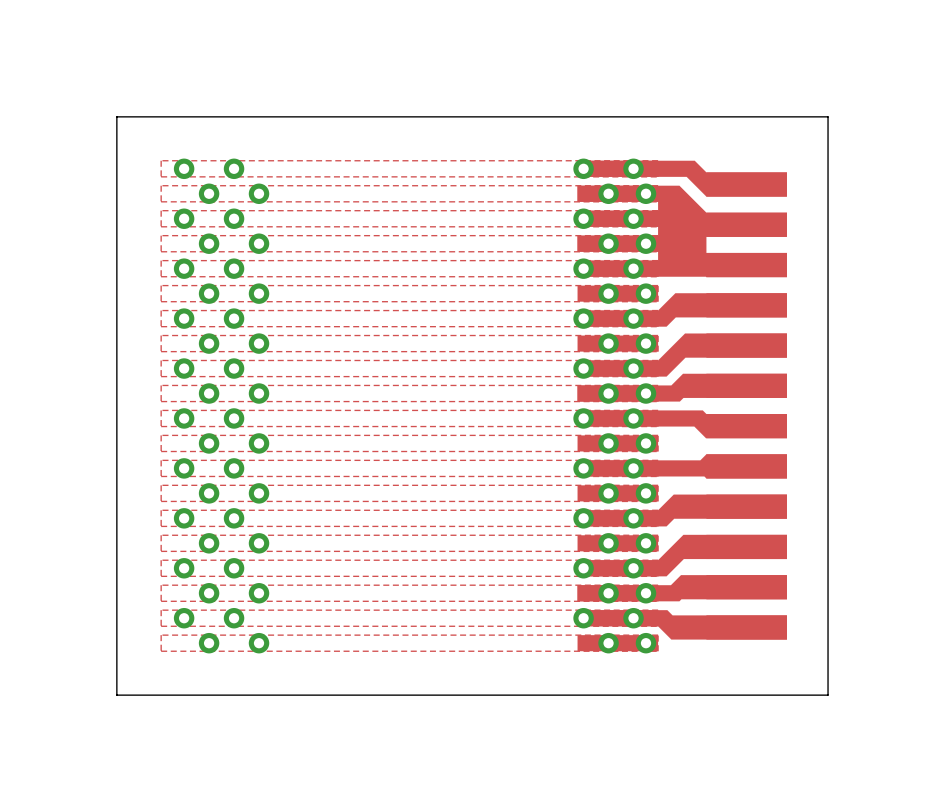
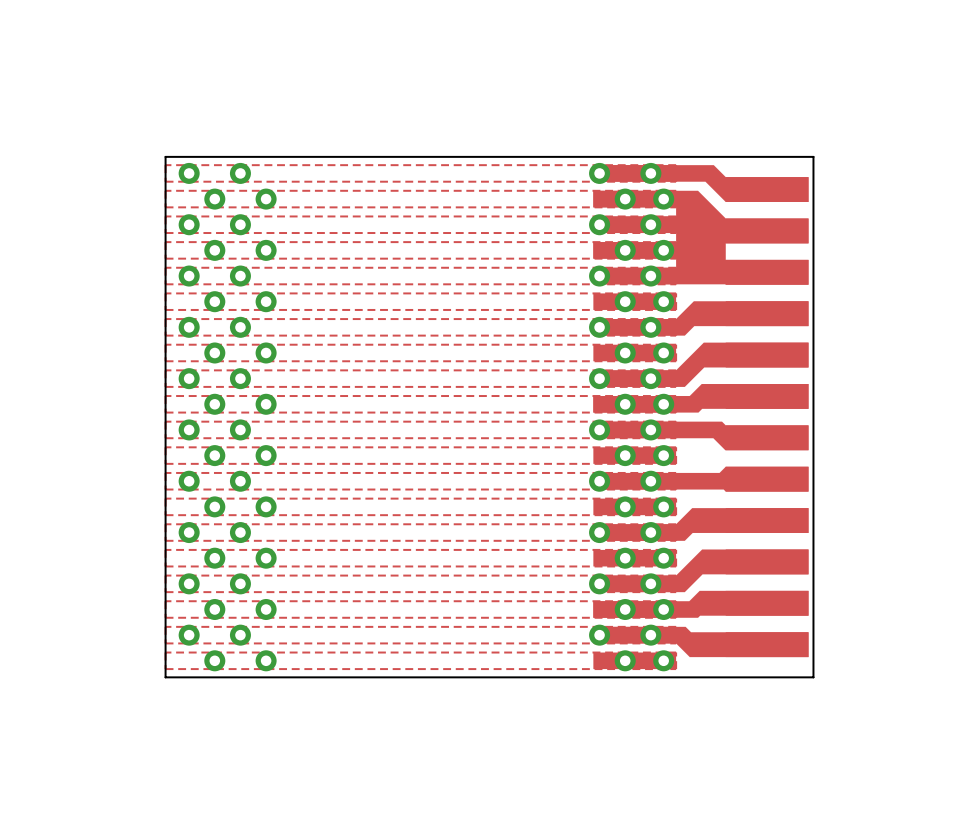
board edge: (116, 116) (828, 116) (828, 695) (116, 695) (116, 116) -> (165, 156) (165, 677) (813, 677) (813, 156) (165, 156)

